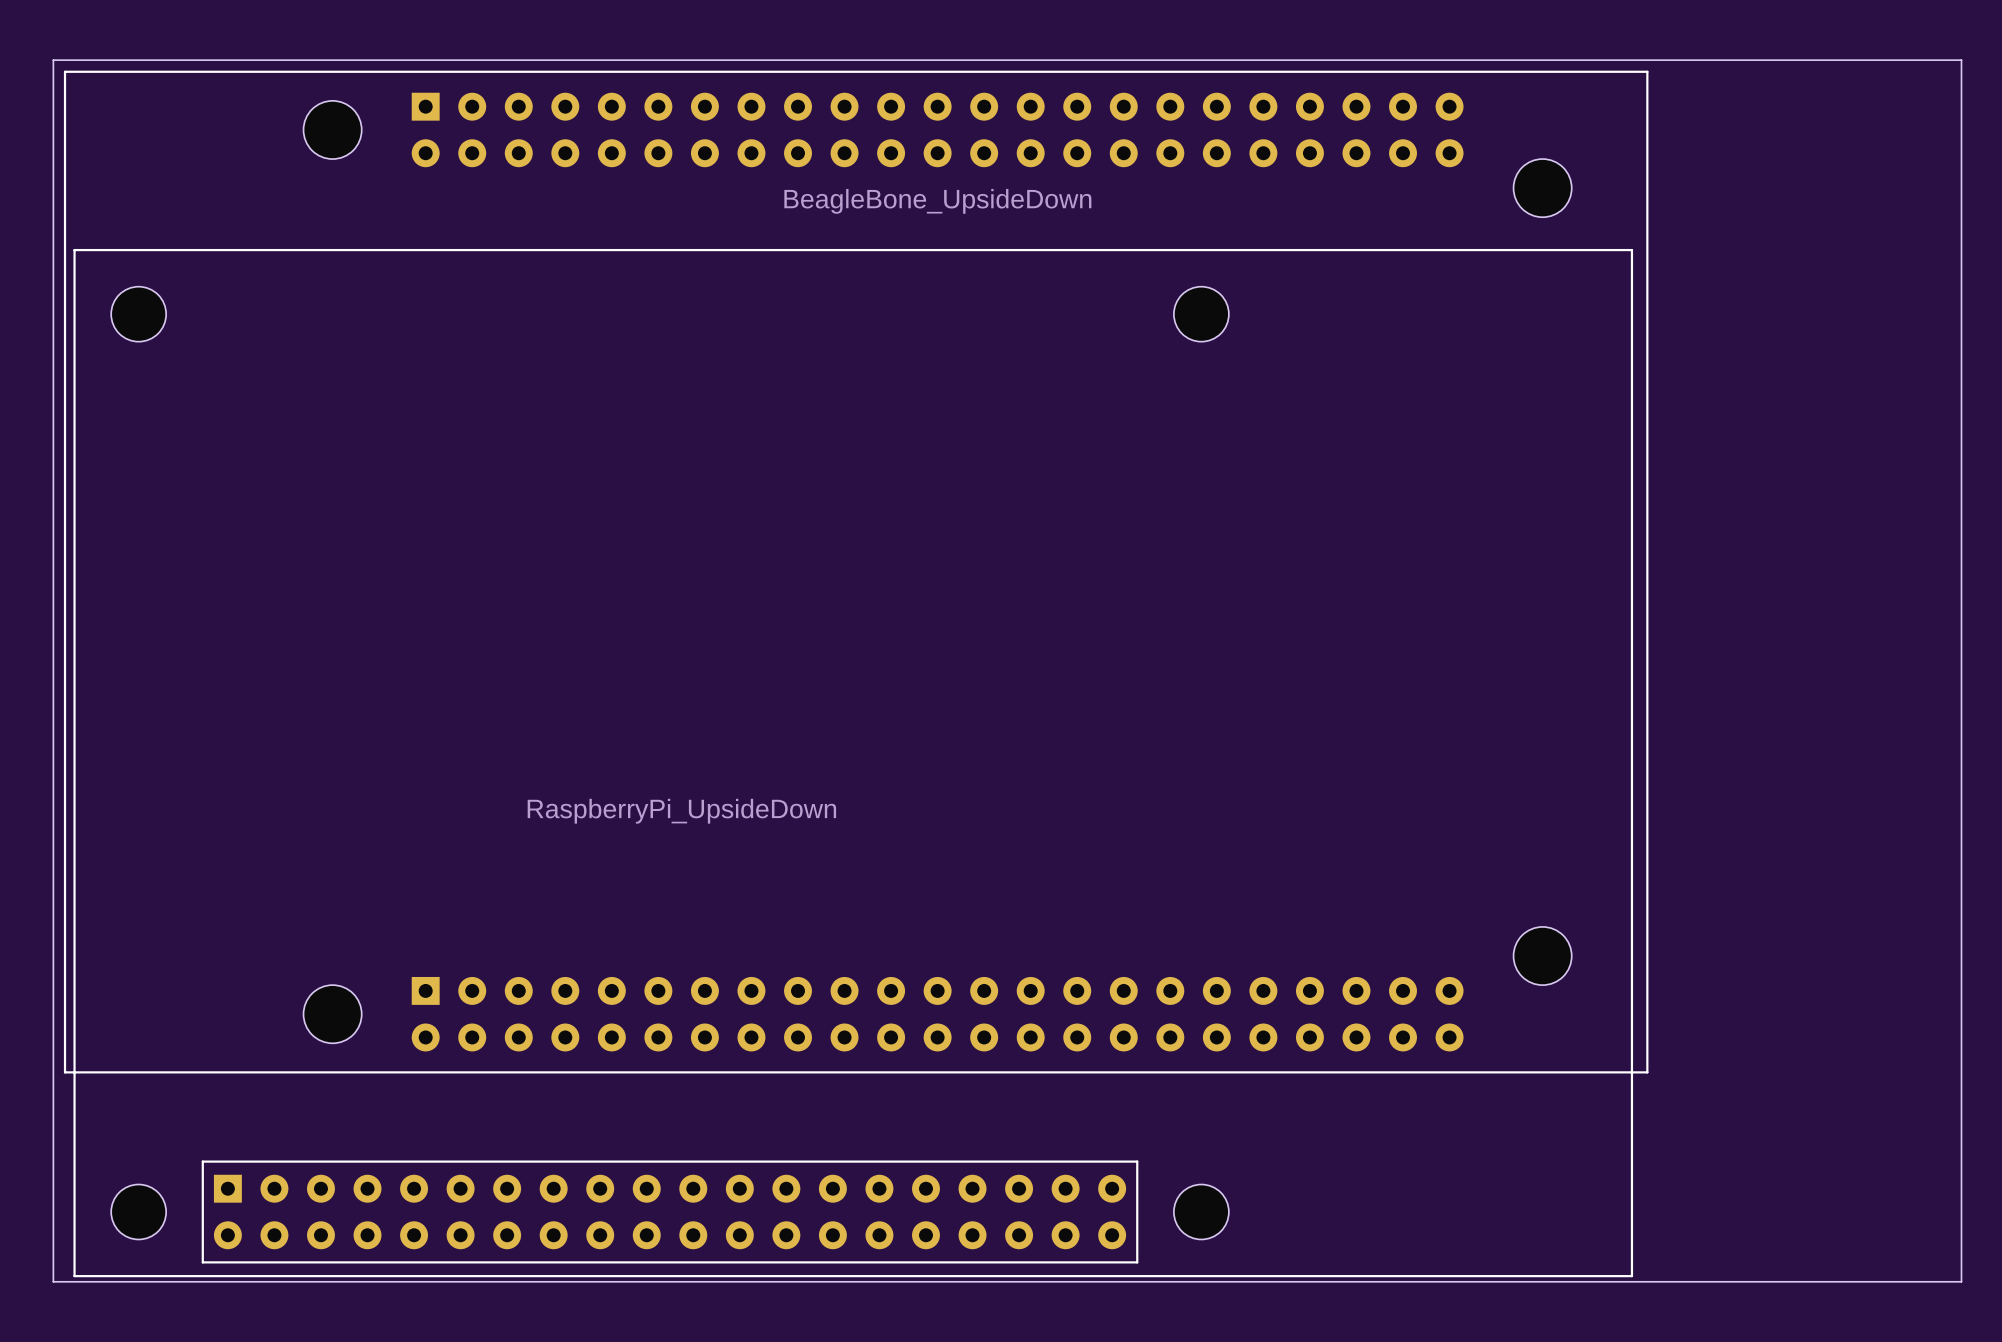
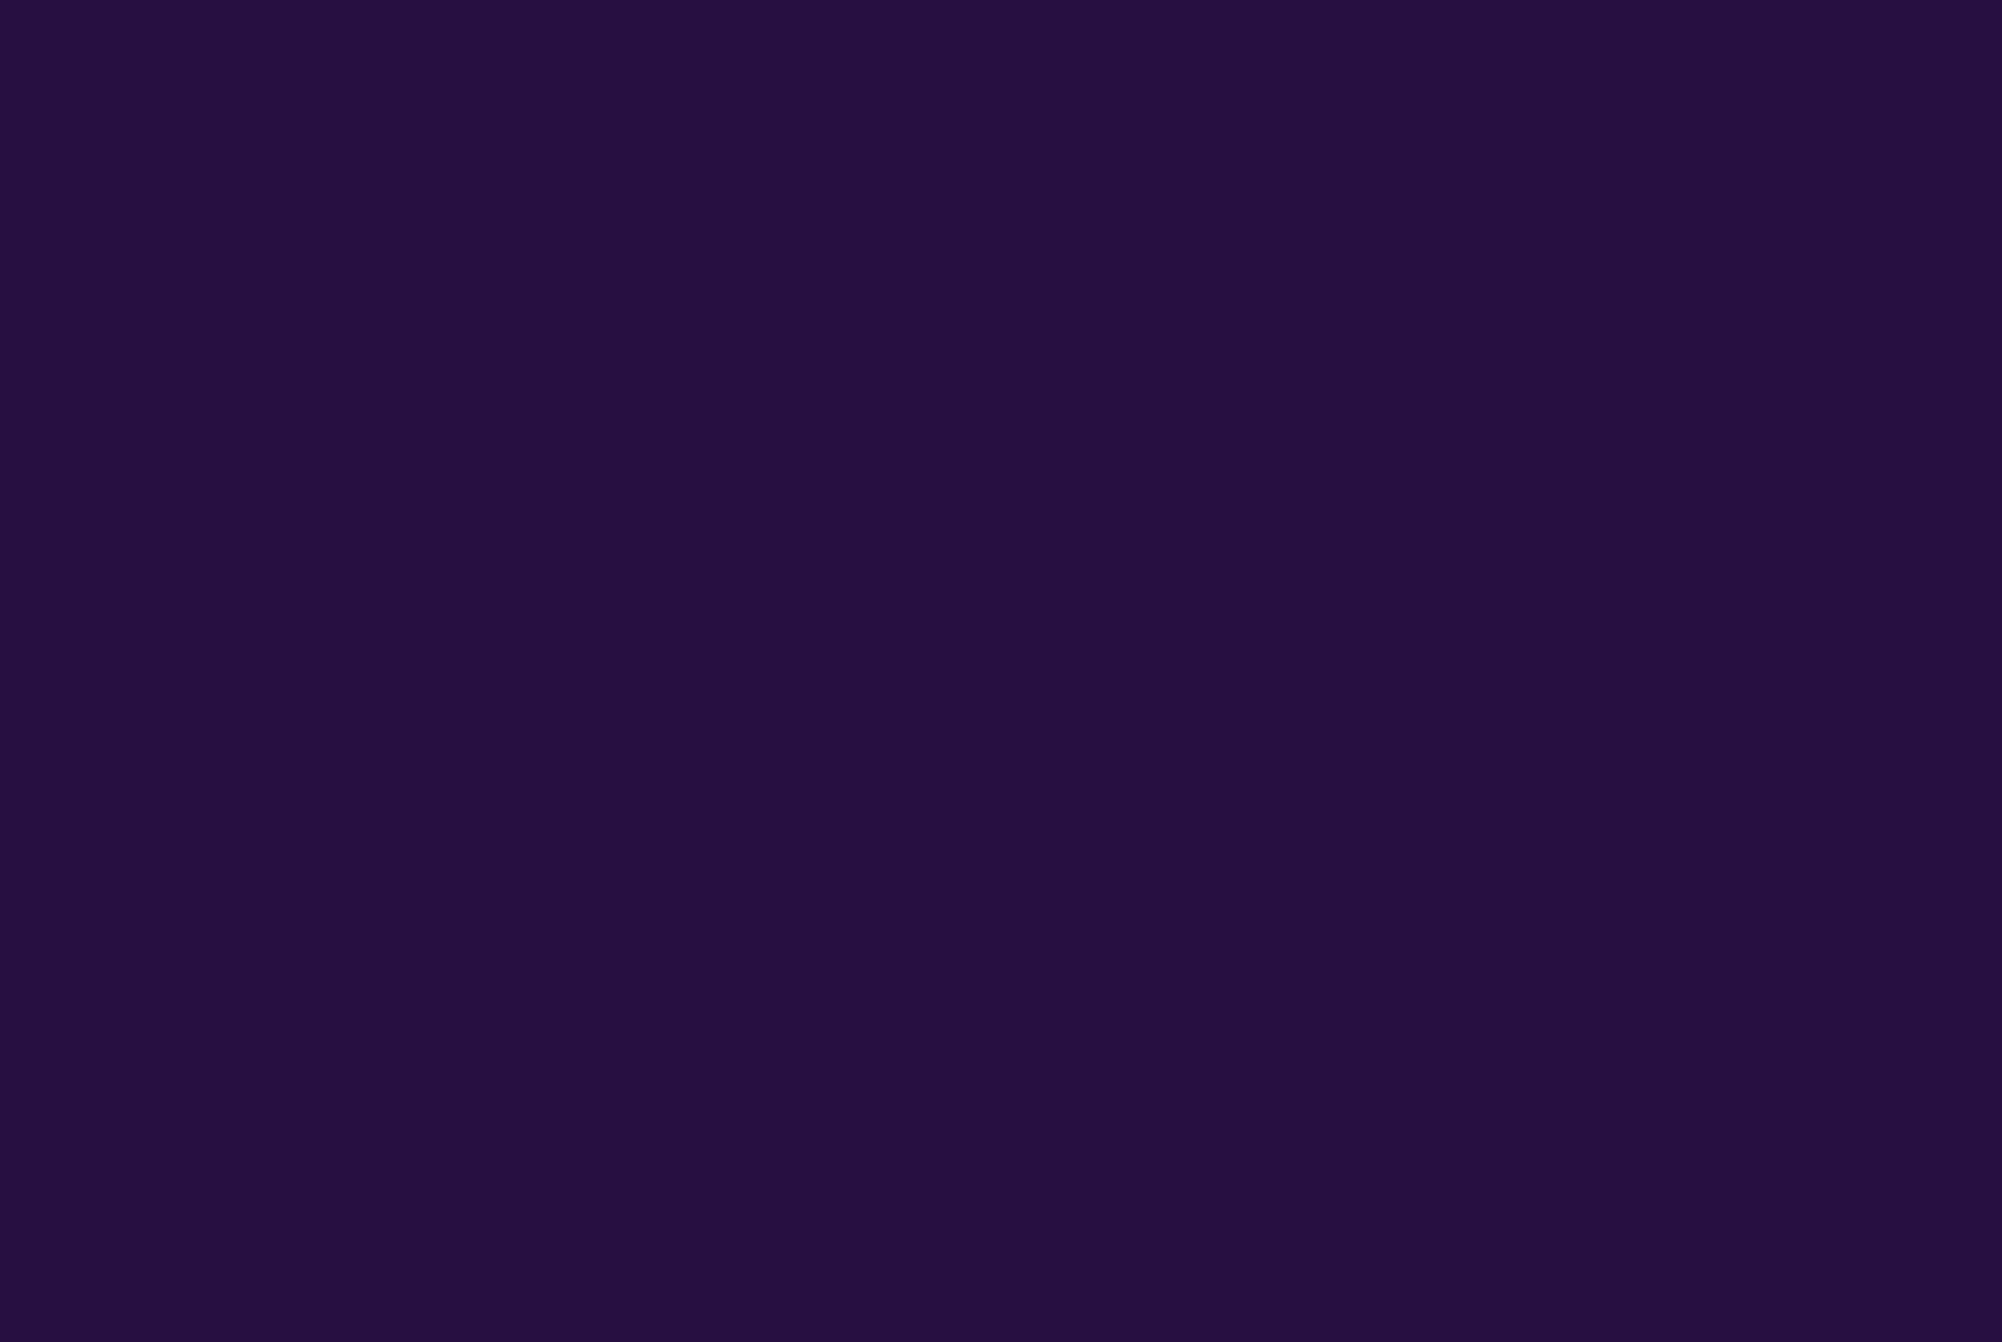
board edge: (53, 60) (1961, 60) (1961, 1281) (53, 1281) (53, 60) -> none
part: BeagleBone_UpsideDown (856, 572) -> none
part: RaspberryPi_UpsideDown (853, 763) -> none

